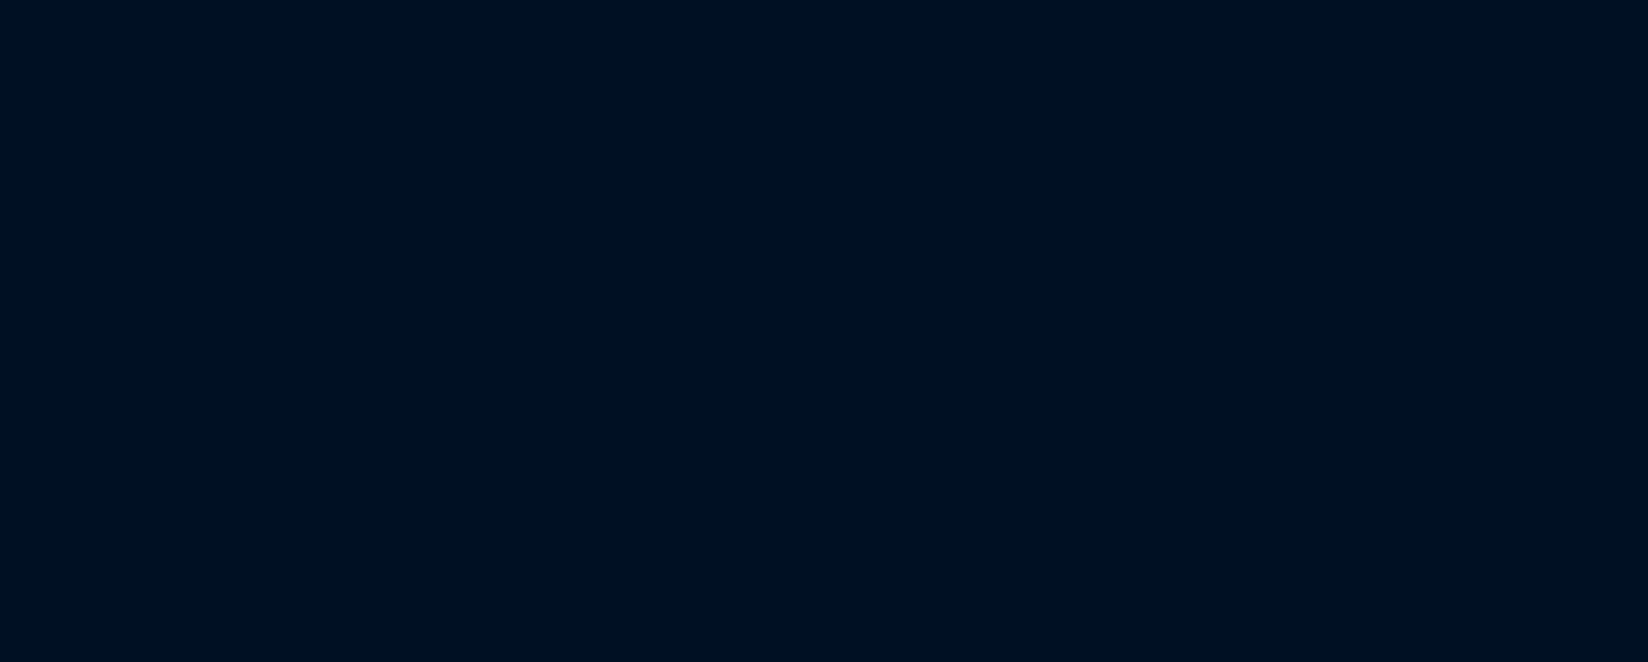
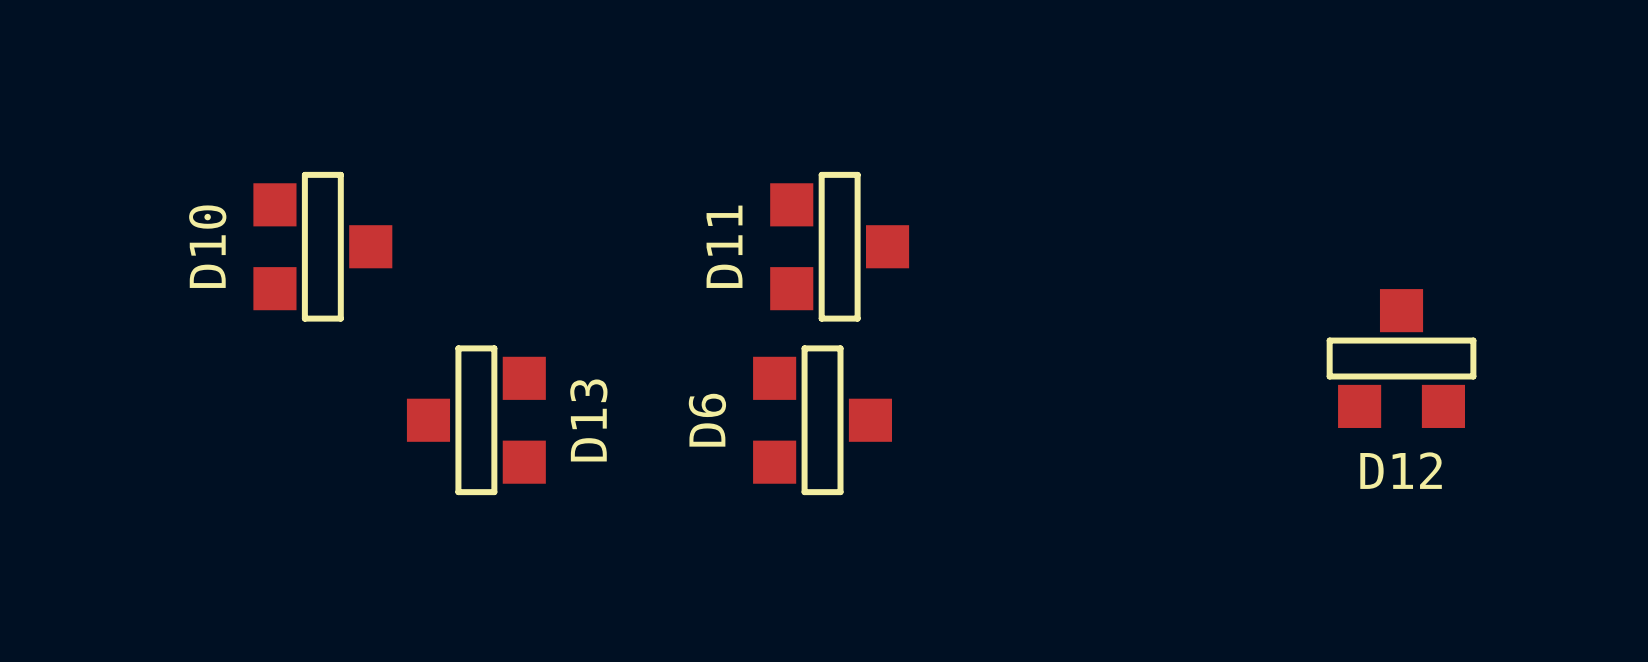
D10: none -> (322, 246)
D11: none -> (839, 246)
D12: none -> (1401, 358)
D13: none -> (476, 420)
D6: none -> (822, 420)

